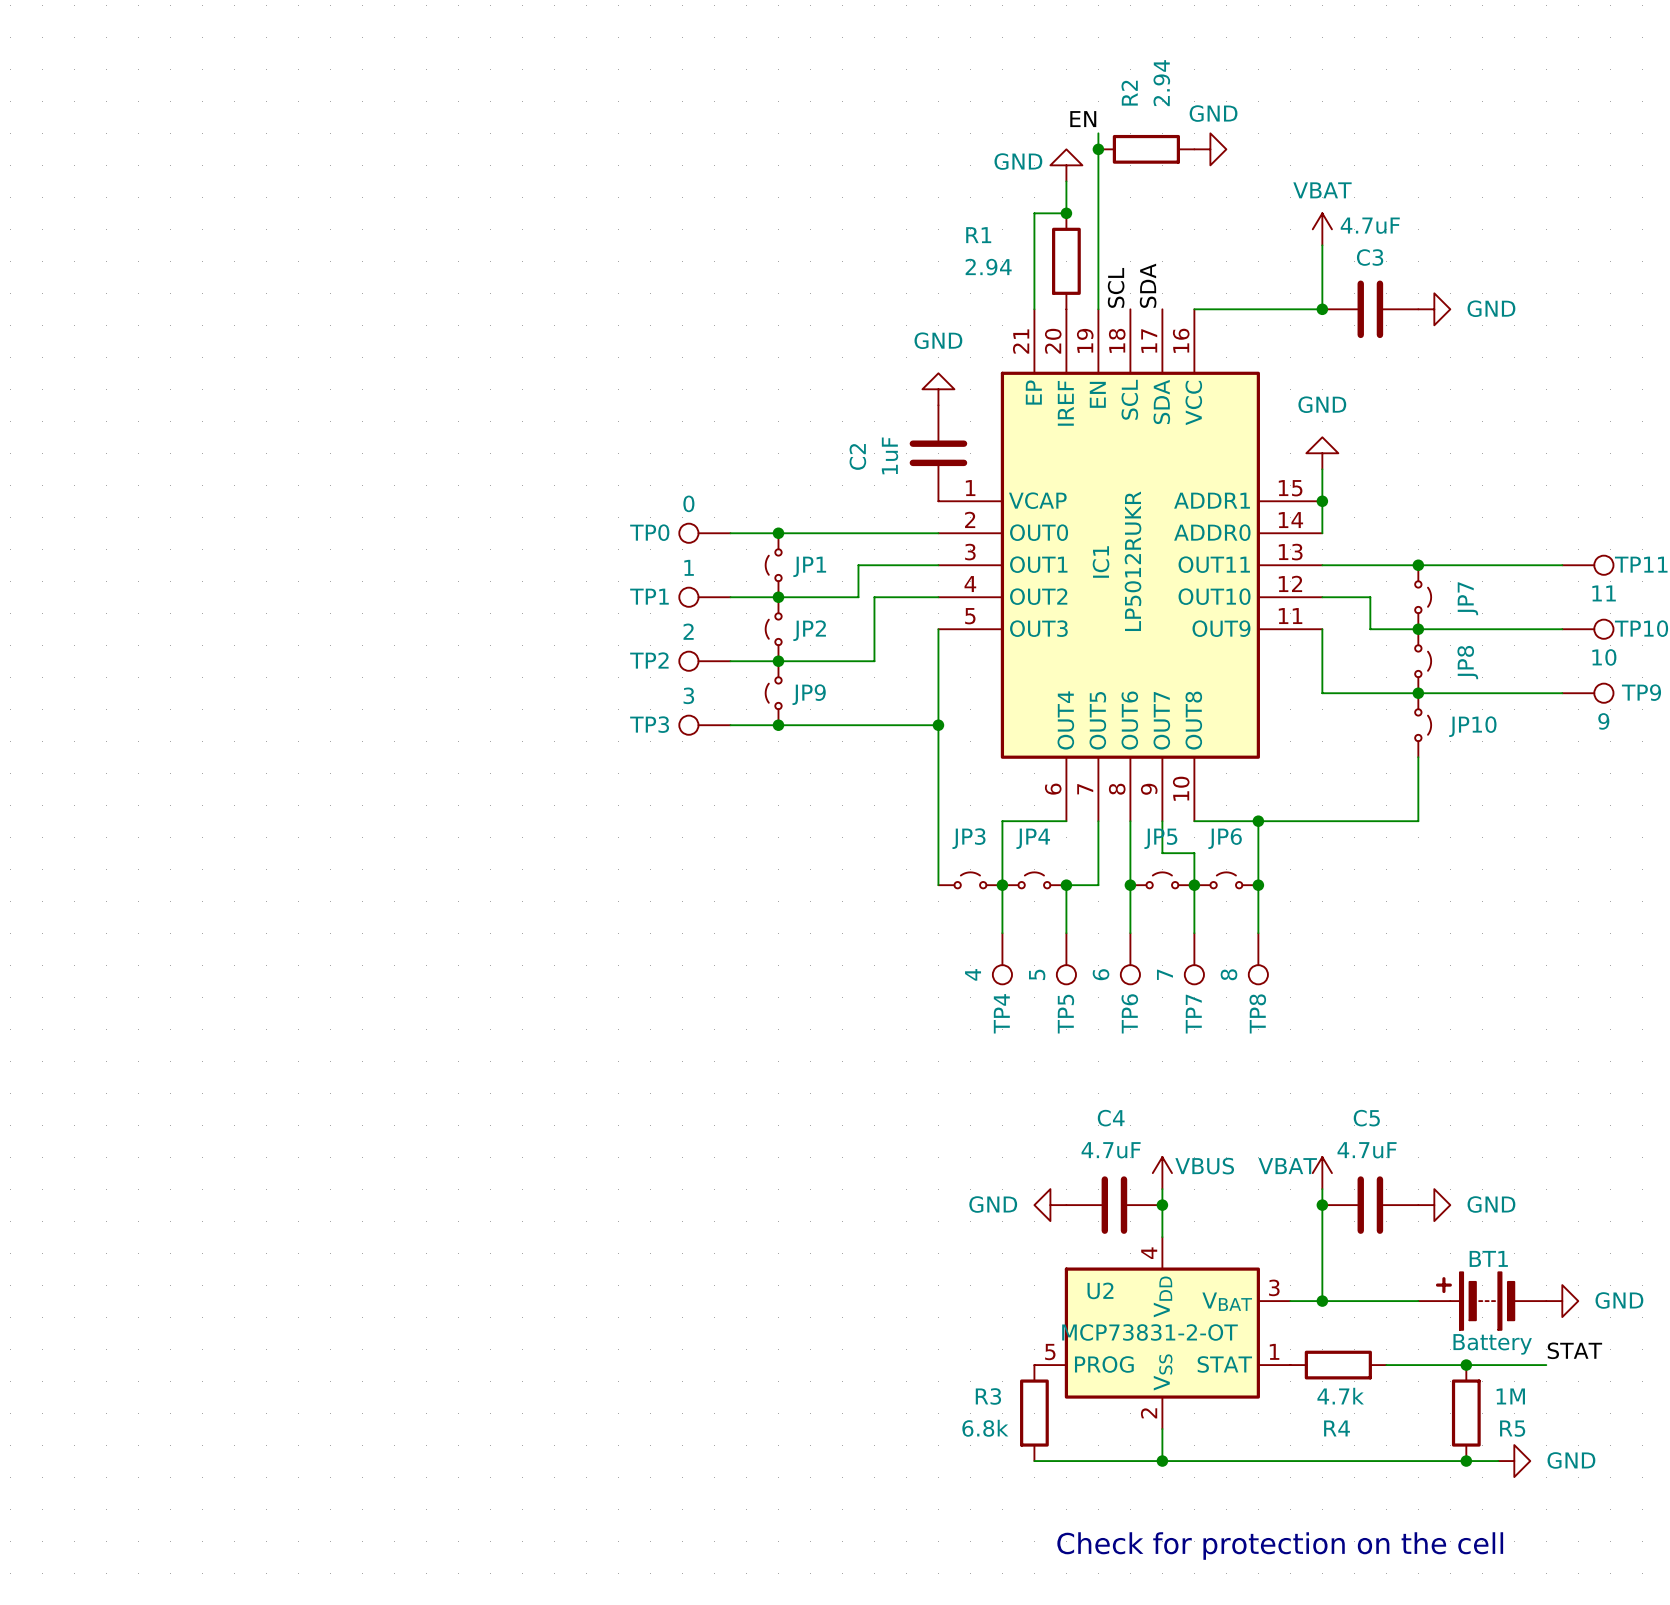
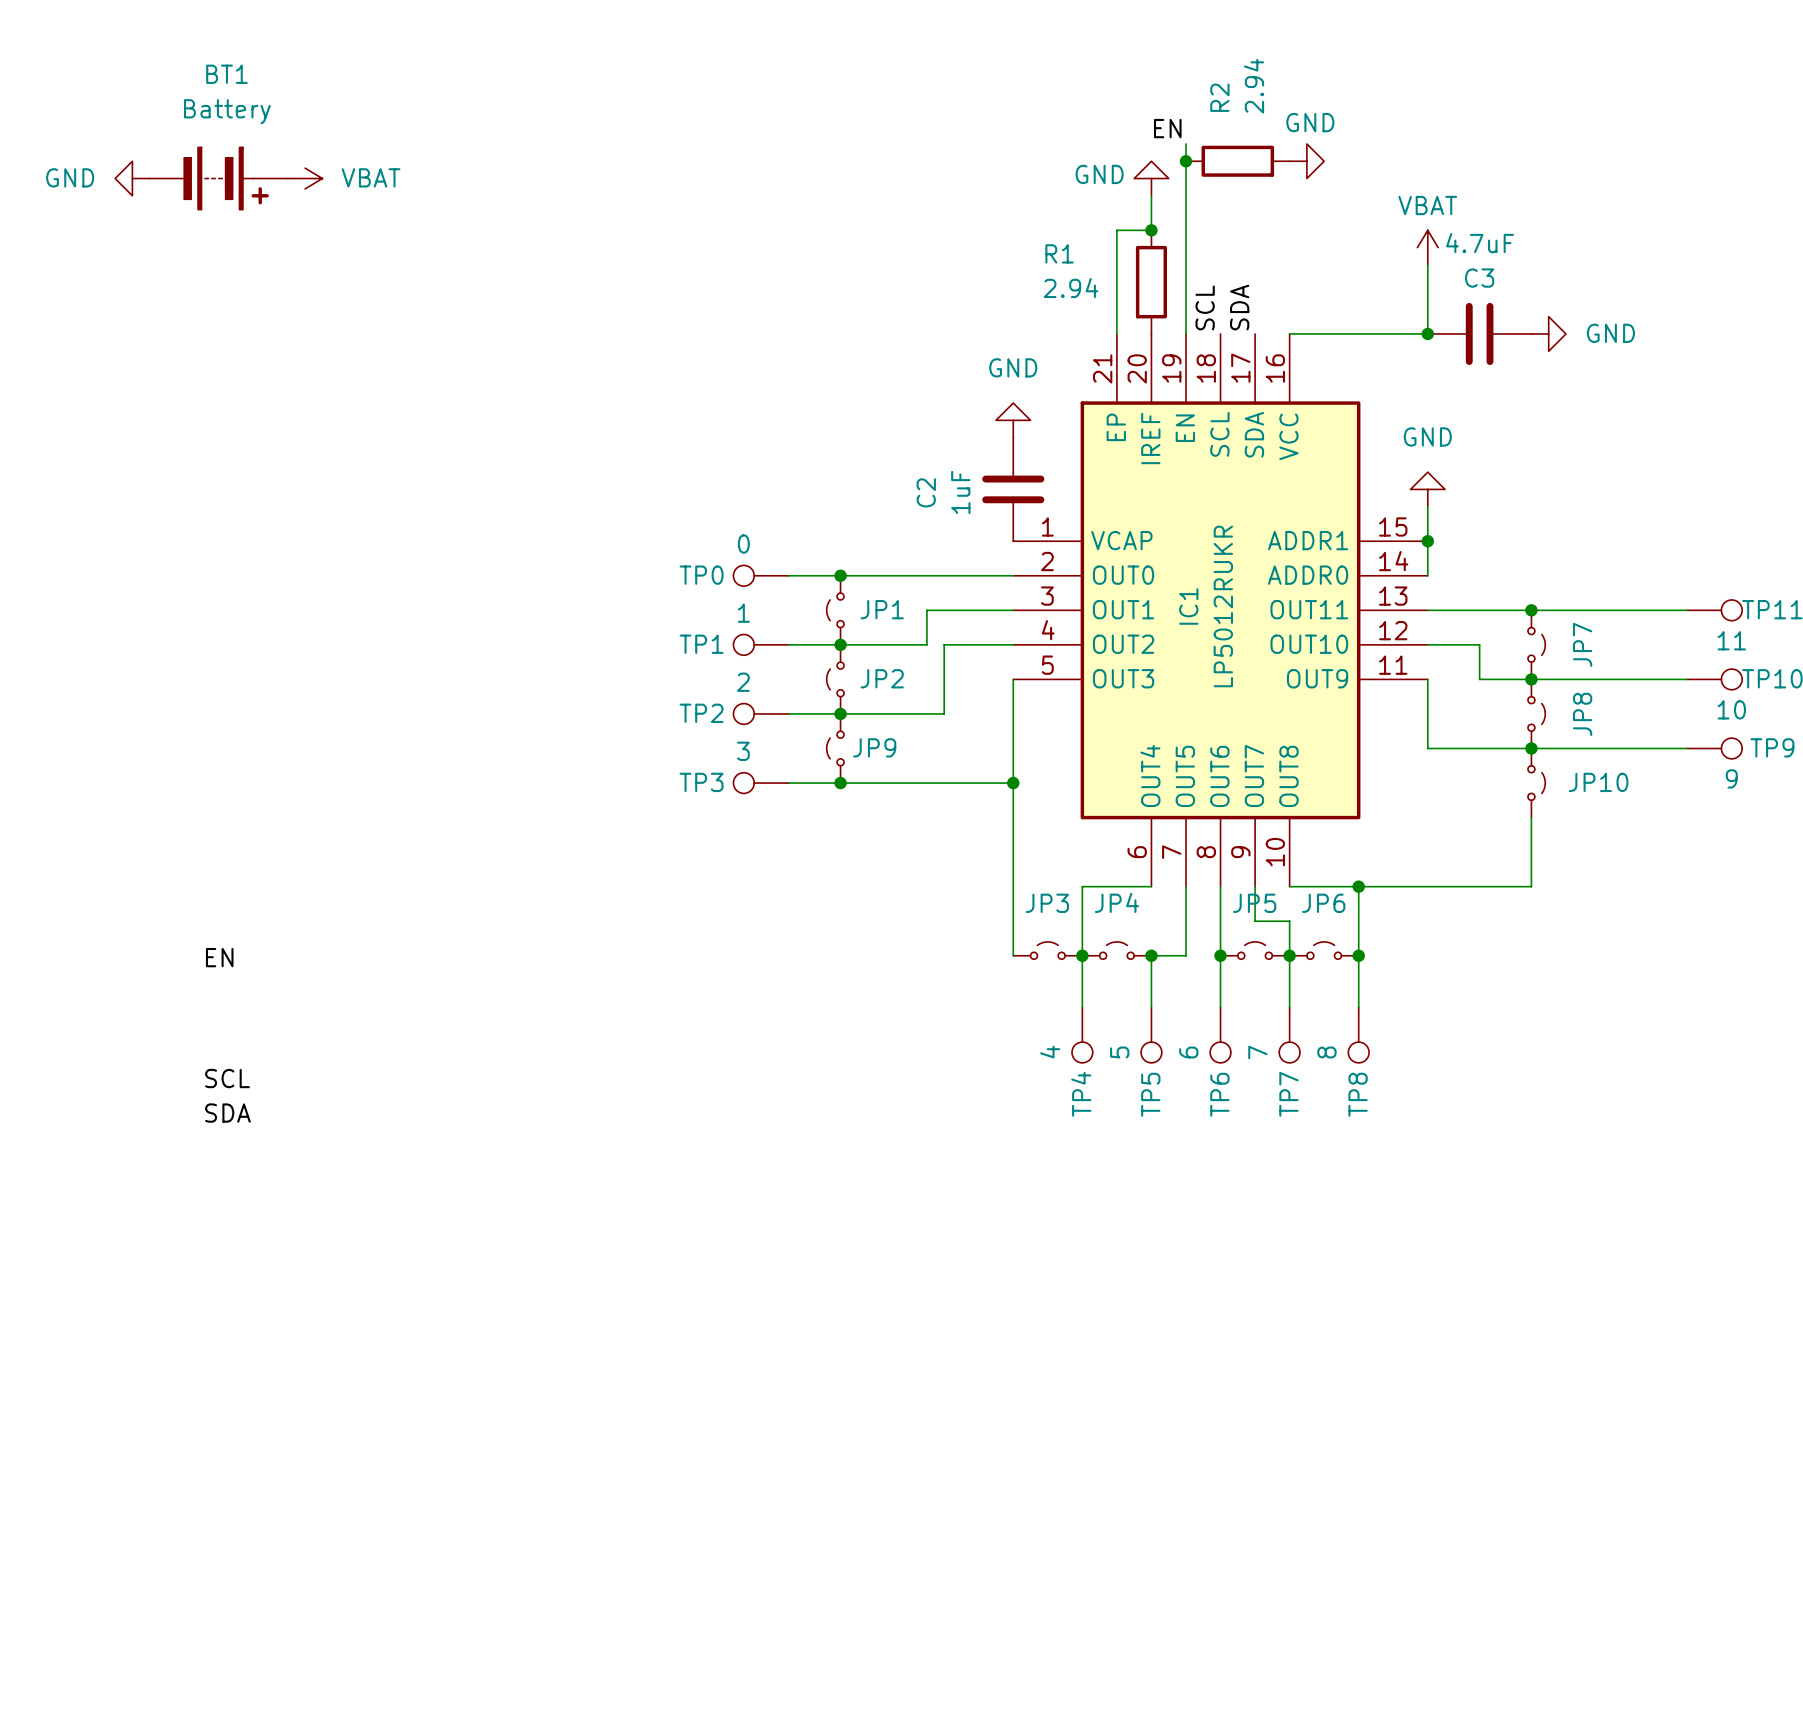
power symbol: none -> GND (132, 178)
power symbol: none -> VBAT (305, 178)
label: none -> EN (219, 957)
label: none -> SCL (227, 1078)
label: none -> SDA (227, 1113)
power symbol: VBUS (1162, 1173) -> none
power symbol: VBAT (1322, 1173) -> none
wire: (1162, 1189) (1162, 1237) -> none
wire: (1322, 1189) (1322, 1301) -> none
power symbol: GND (1050, 1205) -> none
C4: 4.7uF (1114, 1205) -> none
junction: (1162, 1205) -> none
junction: (1322, 1205) -> none
C5: 4.7uF (1370, 1205) -> none
power symbol: GND (1434, 1205) -> none
BT1 name position: BT1 (1488, 1258) -> BT1 (226, 74)
wire: (1290, 1301) (1418, 1301) -> none
junction: (1322, 1301) -> none
BT1 rotation: 0° (1475, 1301) -> 180° (226, 178)
BT1 position: (1482, 1301) -> (218, 178)
power symbol: GND (1562, 1301) -> none
U2: MCP73831-2-OT (1162, 1333) -> none
BT1 value position: Battery (1492, 1344) -> Battery (227, 111)
label: STAT (1574, 1350) -> none
R4: 4.7k (1338, 1365) -> none
wire: (1386, 1365) (1546, 1365) -> none
junction: (1466, 1365) -> none
R3: 6.8k (1034, 1413) -> none
R5: 1M (1466, 1413) -> none
wire: (1162, 1429) (1162, 1461) -> none
wire: (1034, 1461) (1498, 1461) -> none
junction: (1162, 1461) -> none
junction: (1466, 1461) -> none
power symbol: GND (1514, 1461) -> none
text: Check for protection on the cell (1280, 1546) -> none

